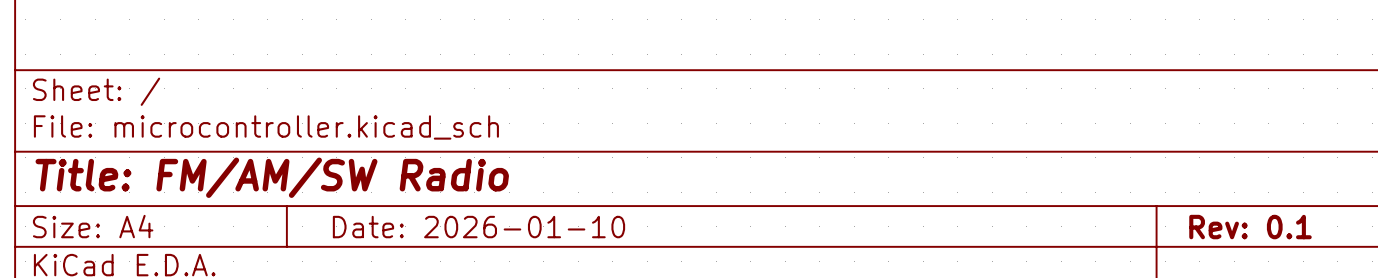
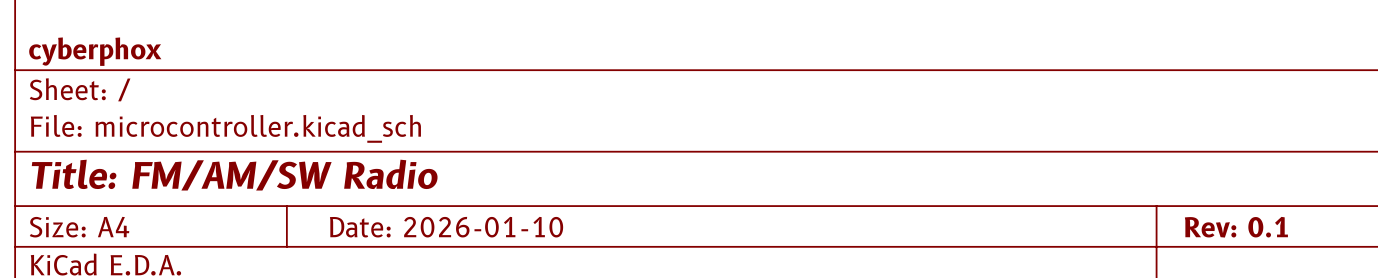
title block: none -> cyberphox (95, 51)

